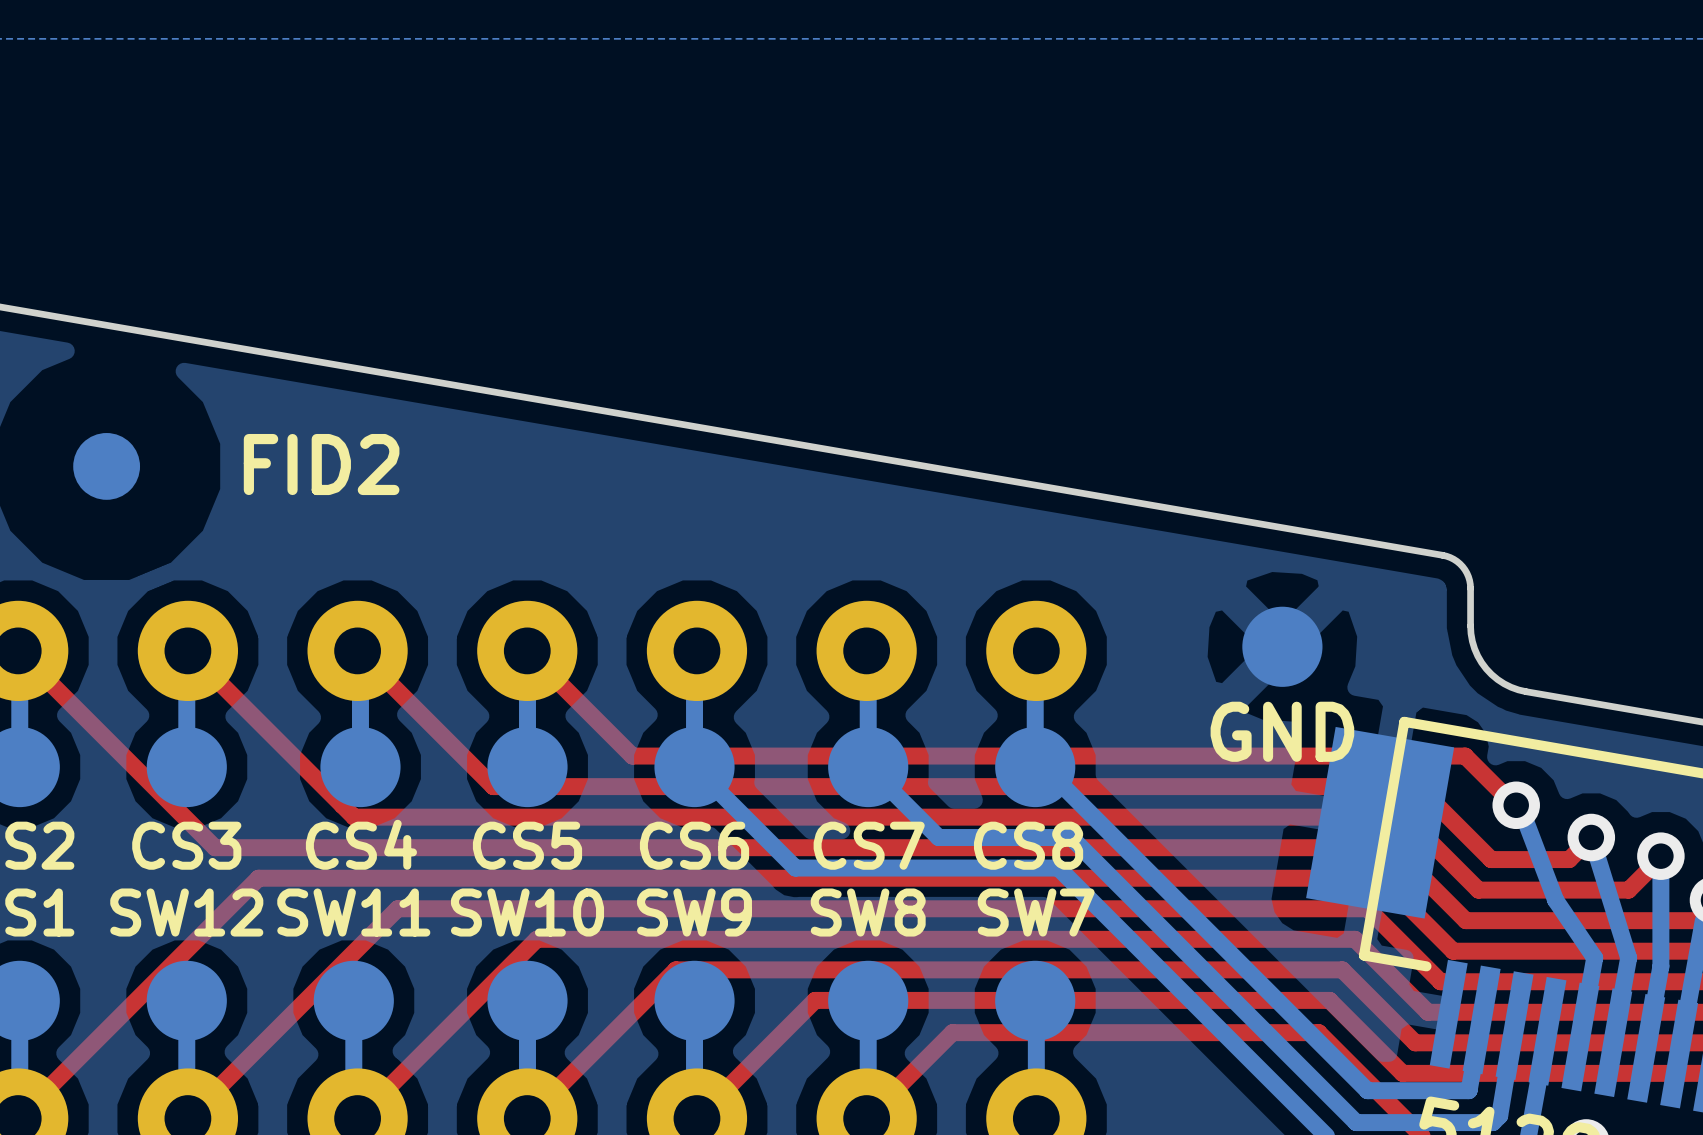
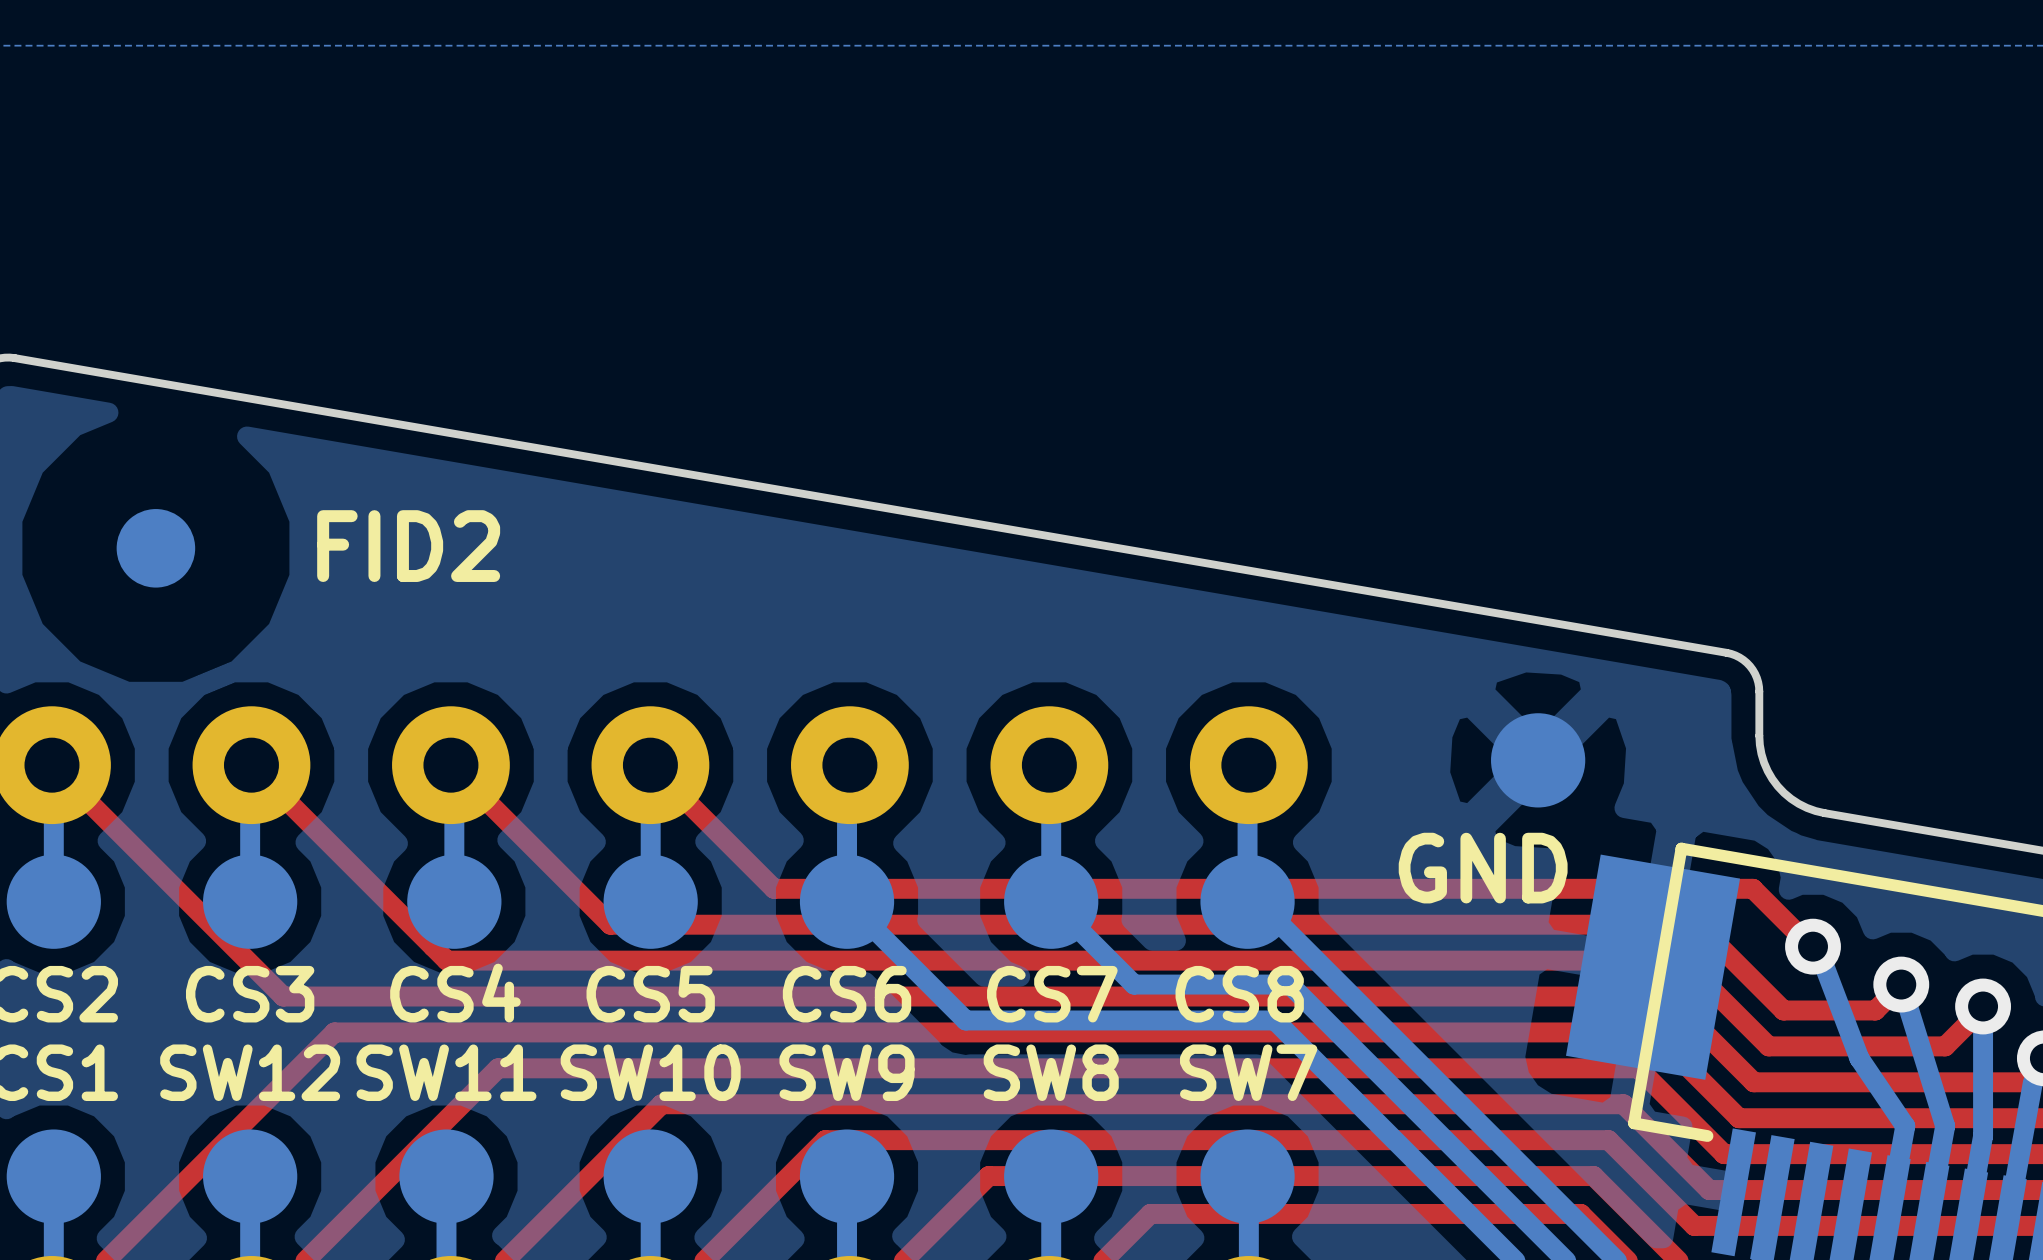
part value position: GND (1282, 731) -> GND (1483, 868)

